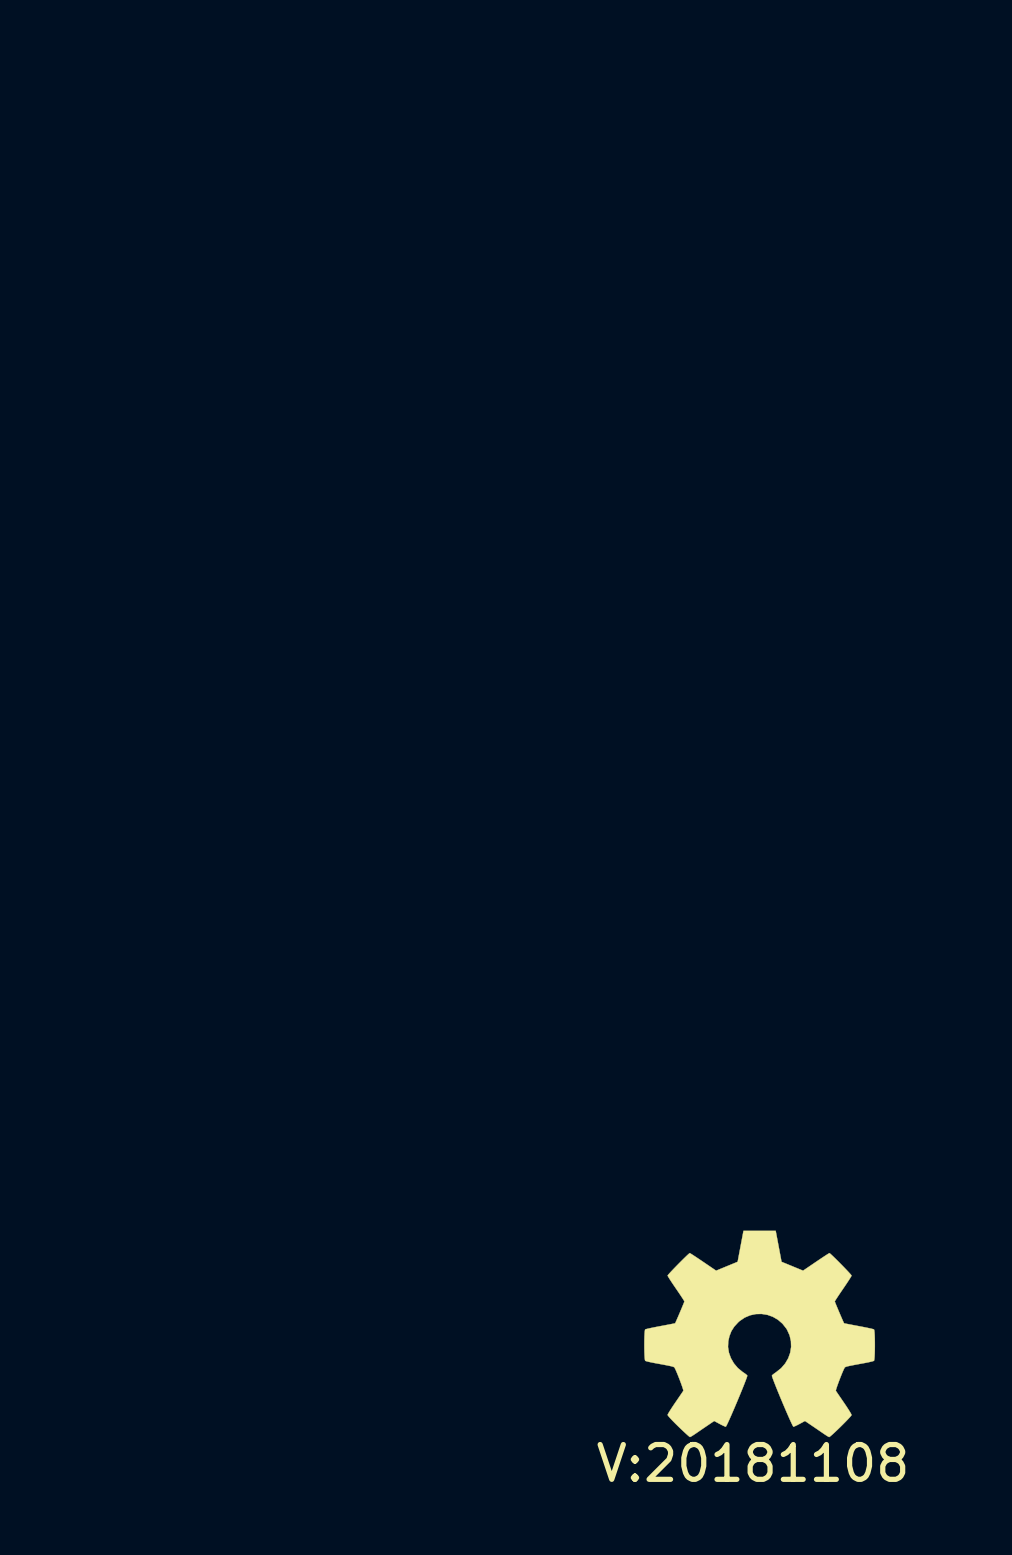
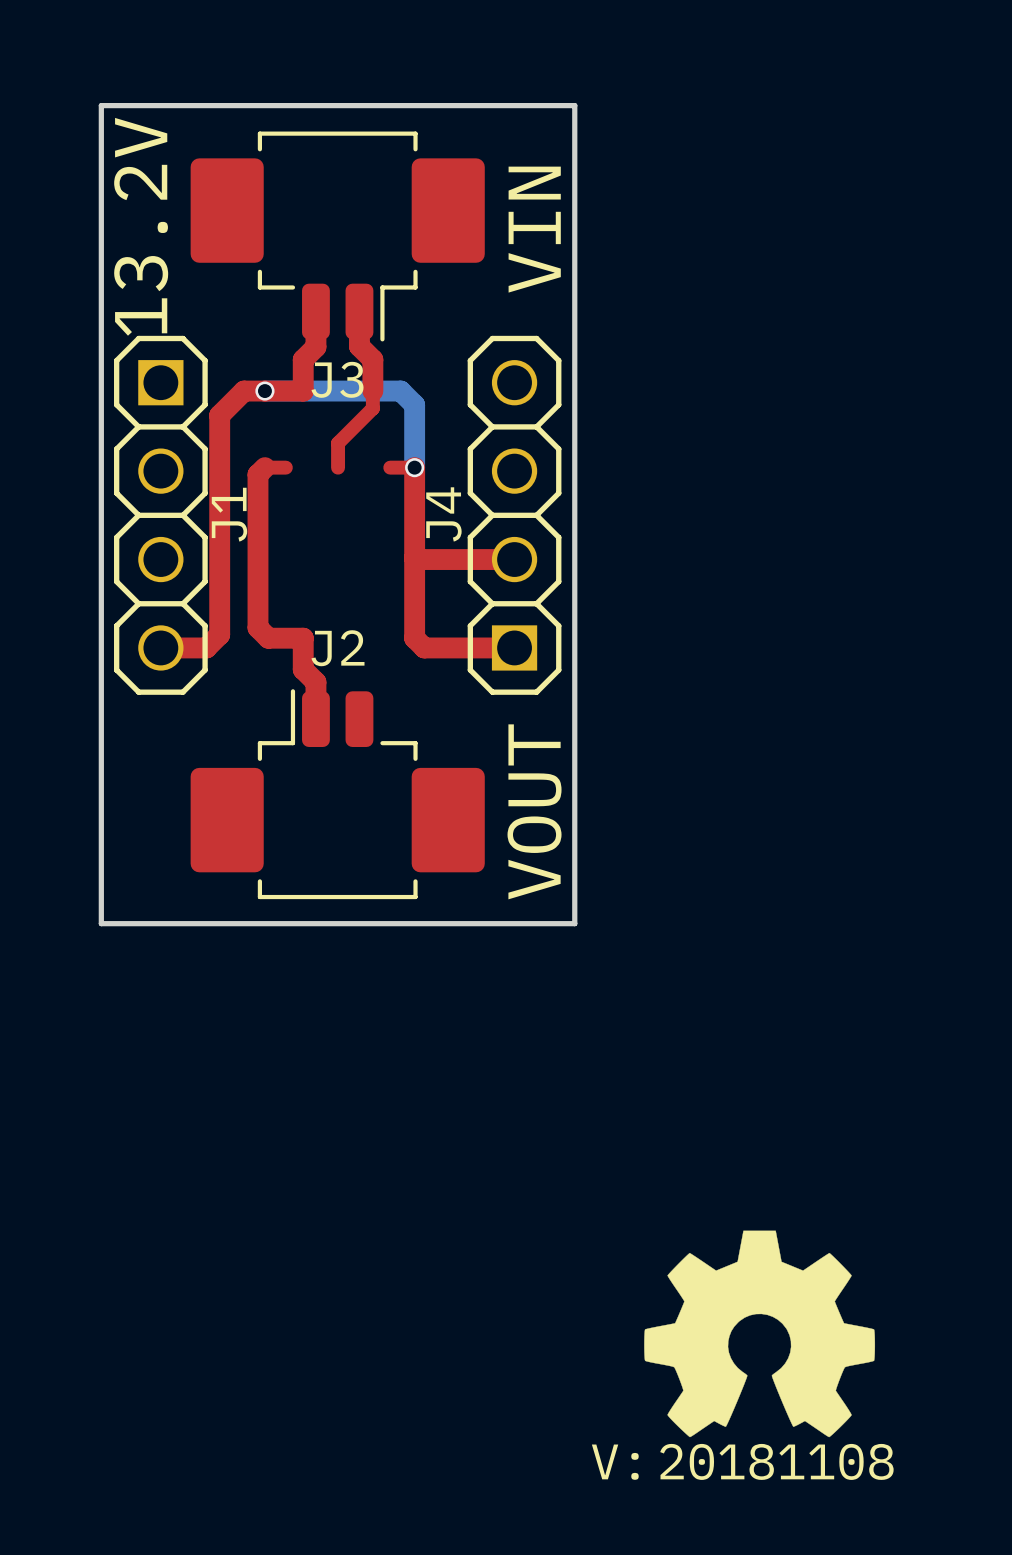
board edge: none -> (101, 105) (101, 923) (574, 923) (574, 105) (101, 105)
text: none -> 13.2V (141, 226)
text: none -> VIN (534, 229)
J3: none -> (337, 236)
top track: none -> (315, 311) (315, 347) (303, 359) (303, 391) (244, 391) (219, 415) (219, 634) (206, 647) (160, 647)
top track: none -> (359, 311) (359, 346) (372, 359) (372, 408) (338, 443) (338, 467)
bottom track: none -> (264, 391) (400, 391) (414, 404) (414, 467)
via: none -> (264, 391)
top track: none -> (285, 467) (264, 467) (257, 474) (257, 627) (268, 638) (303, 638) (303, 669) (315, 682) (315, 719)
top track: none -> (390, 467) (414, 467) (414, 638) (424, 647) (514, 647)
via: none -> (414, 467)
J1: none -> (160, 515)
J4: none -> (514, 515)
top track: none -> (414, 558) (514, 559)
J2: none -> (337, 794)
text: none -> VOUT (534, 811)

